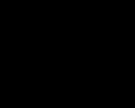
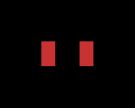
part: none -> (67, 53)

